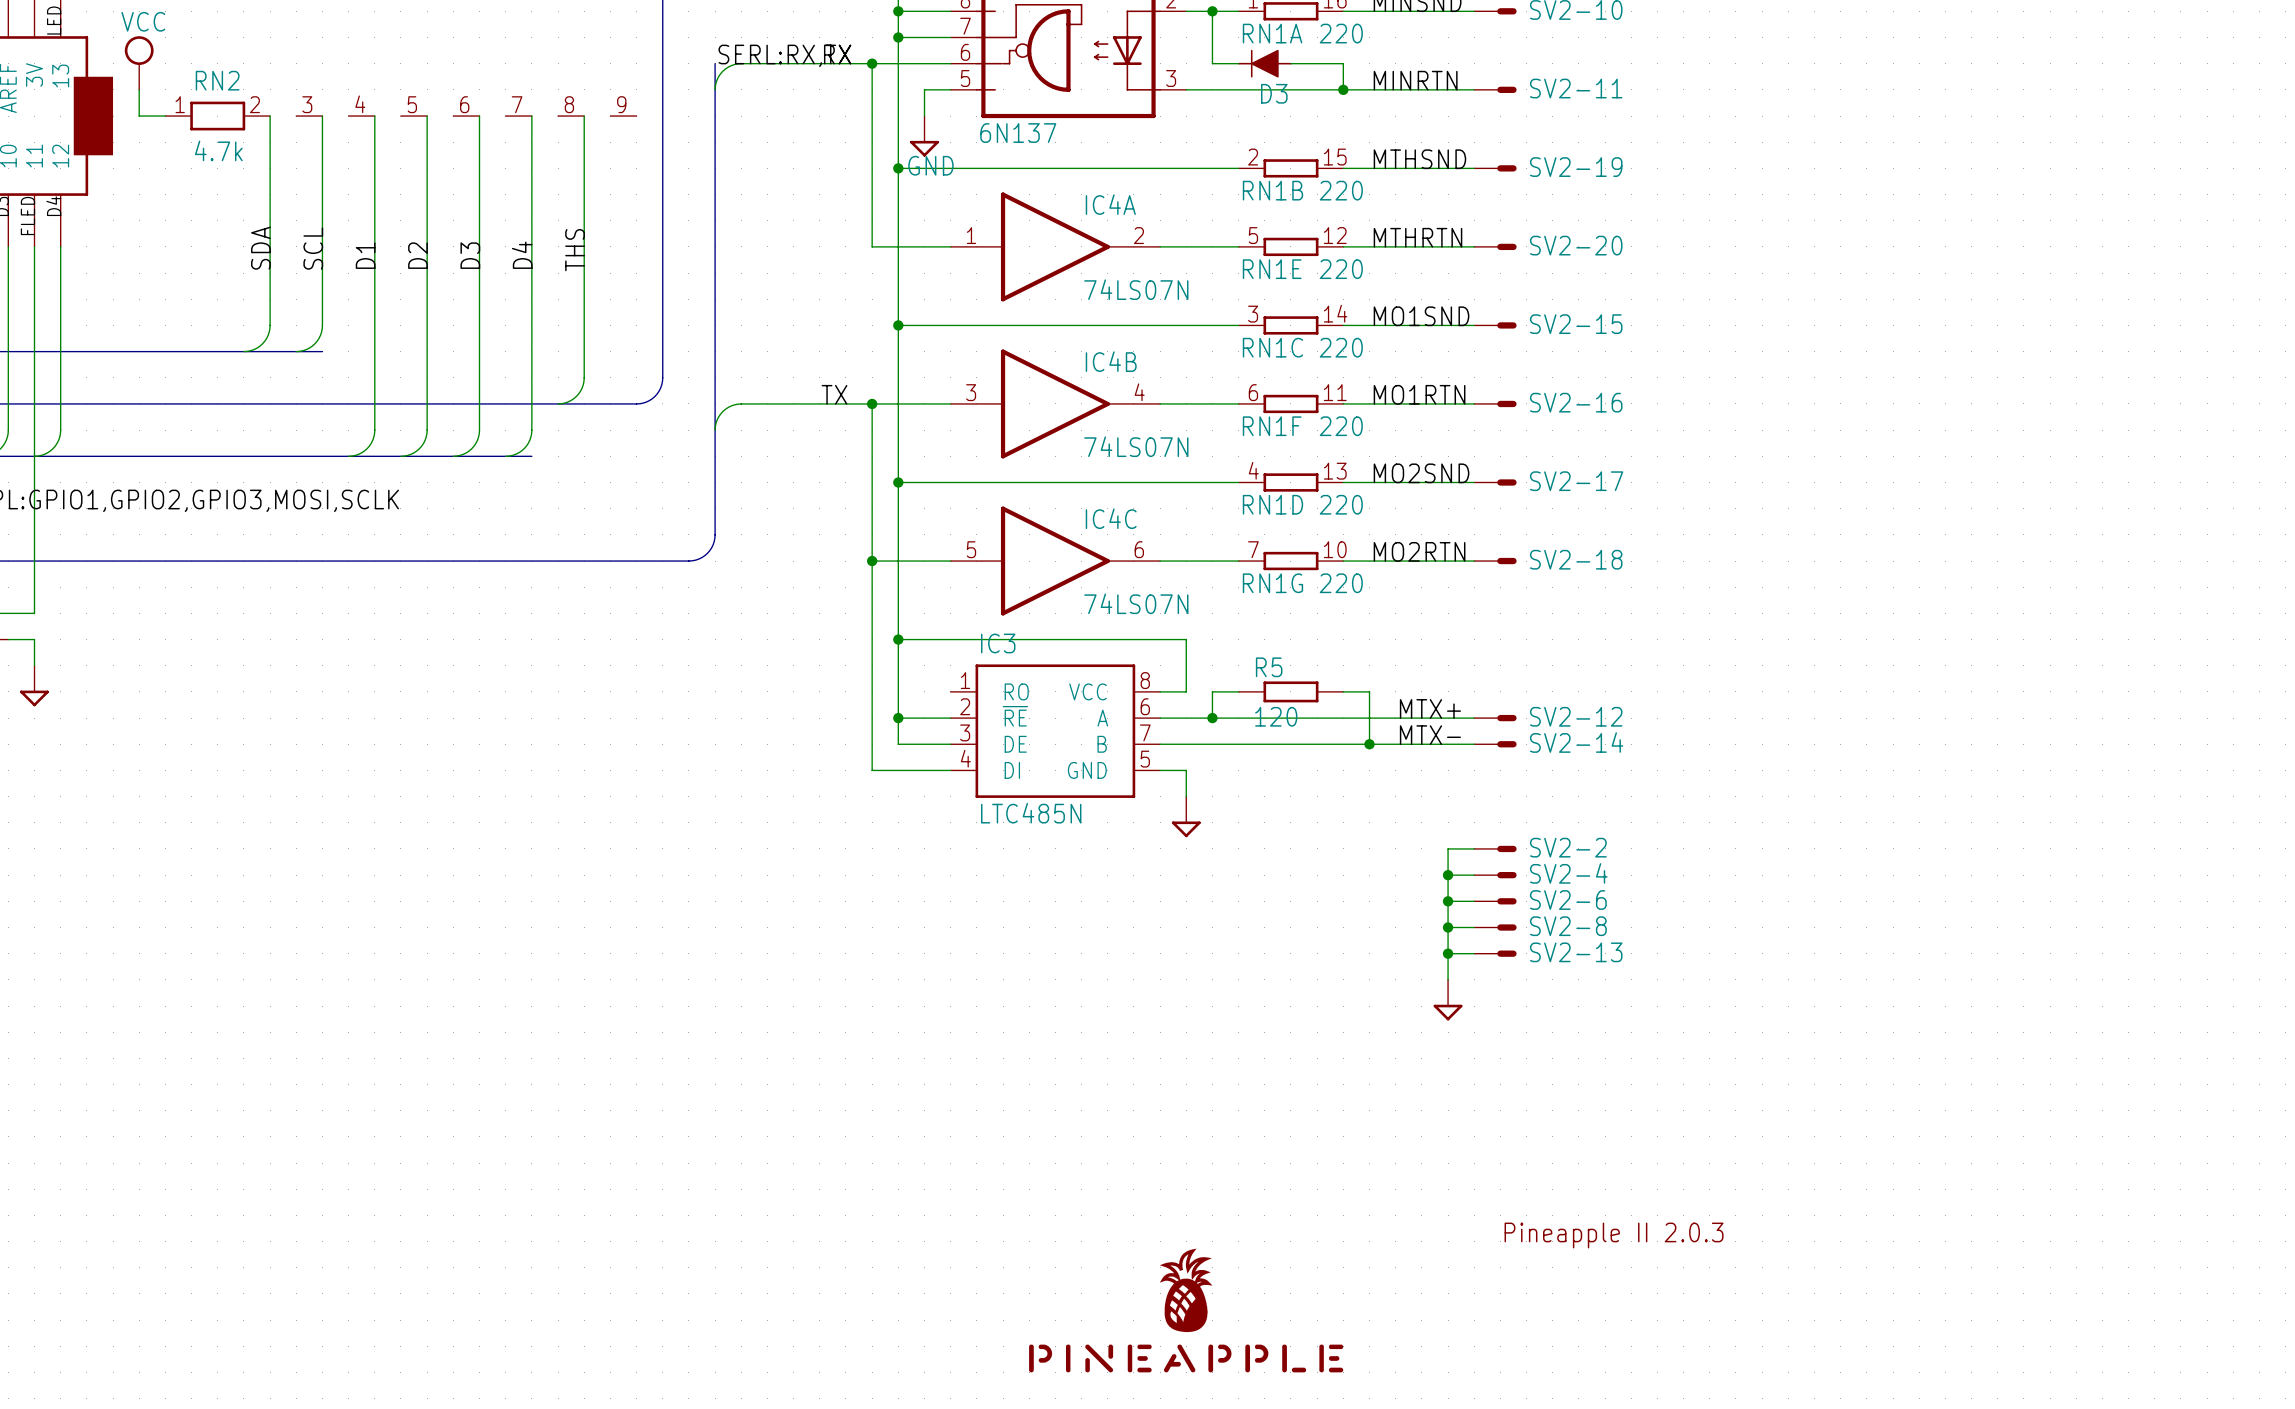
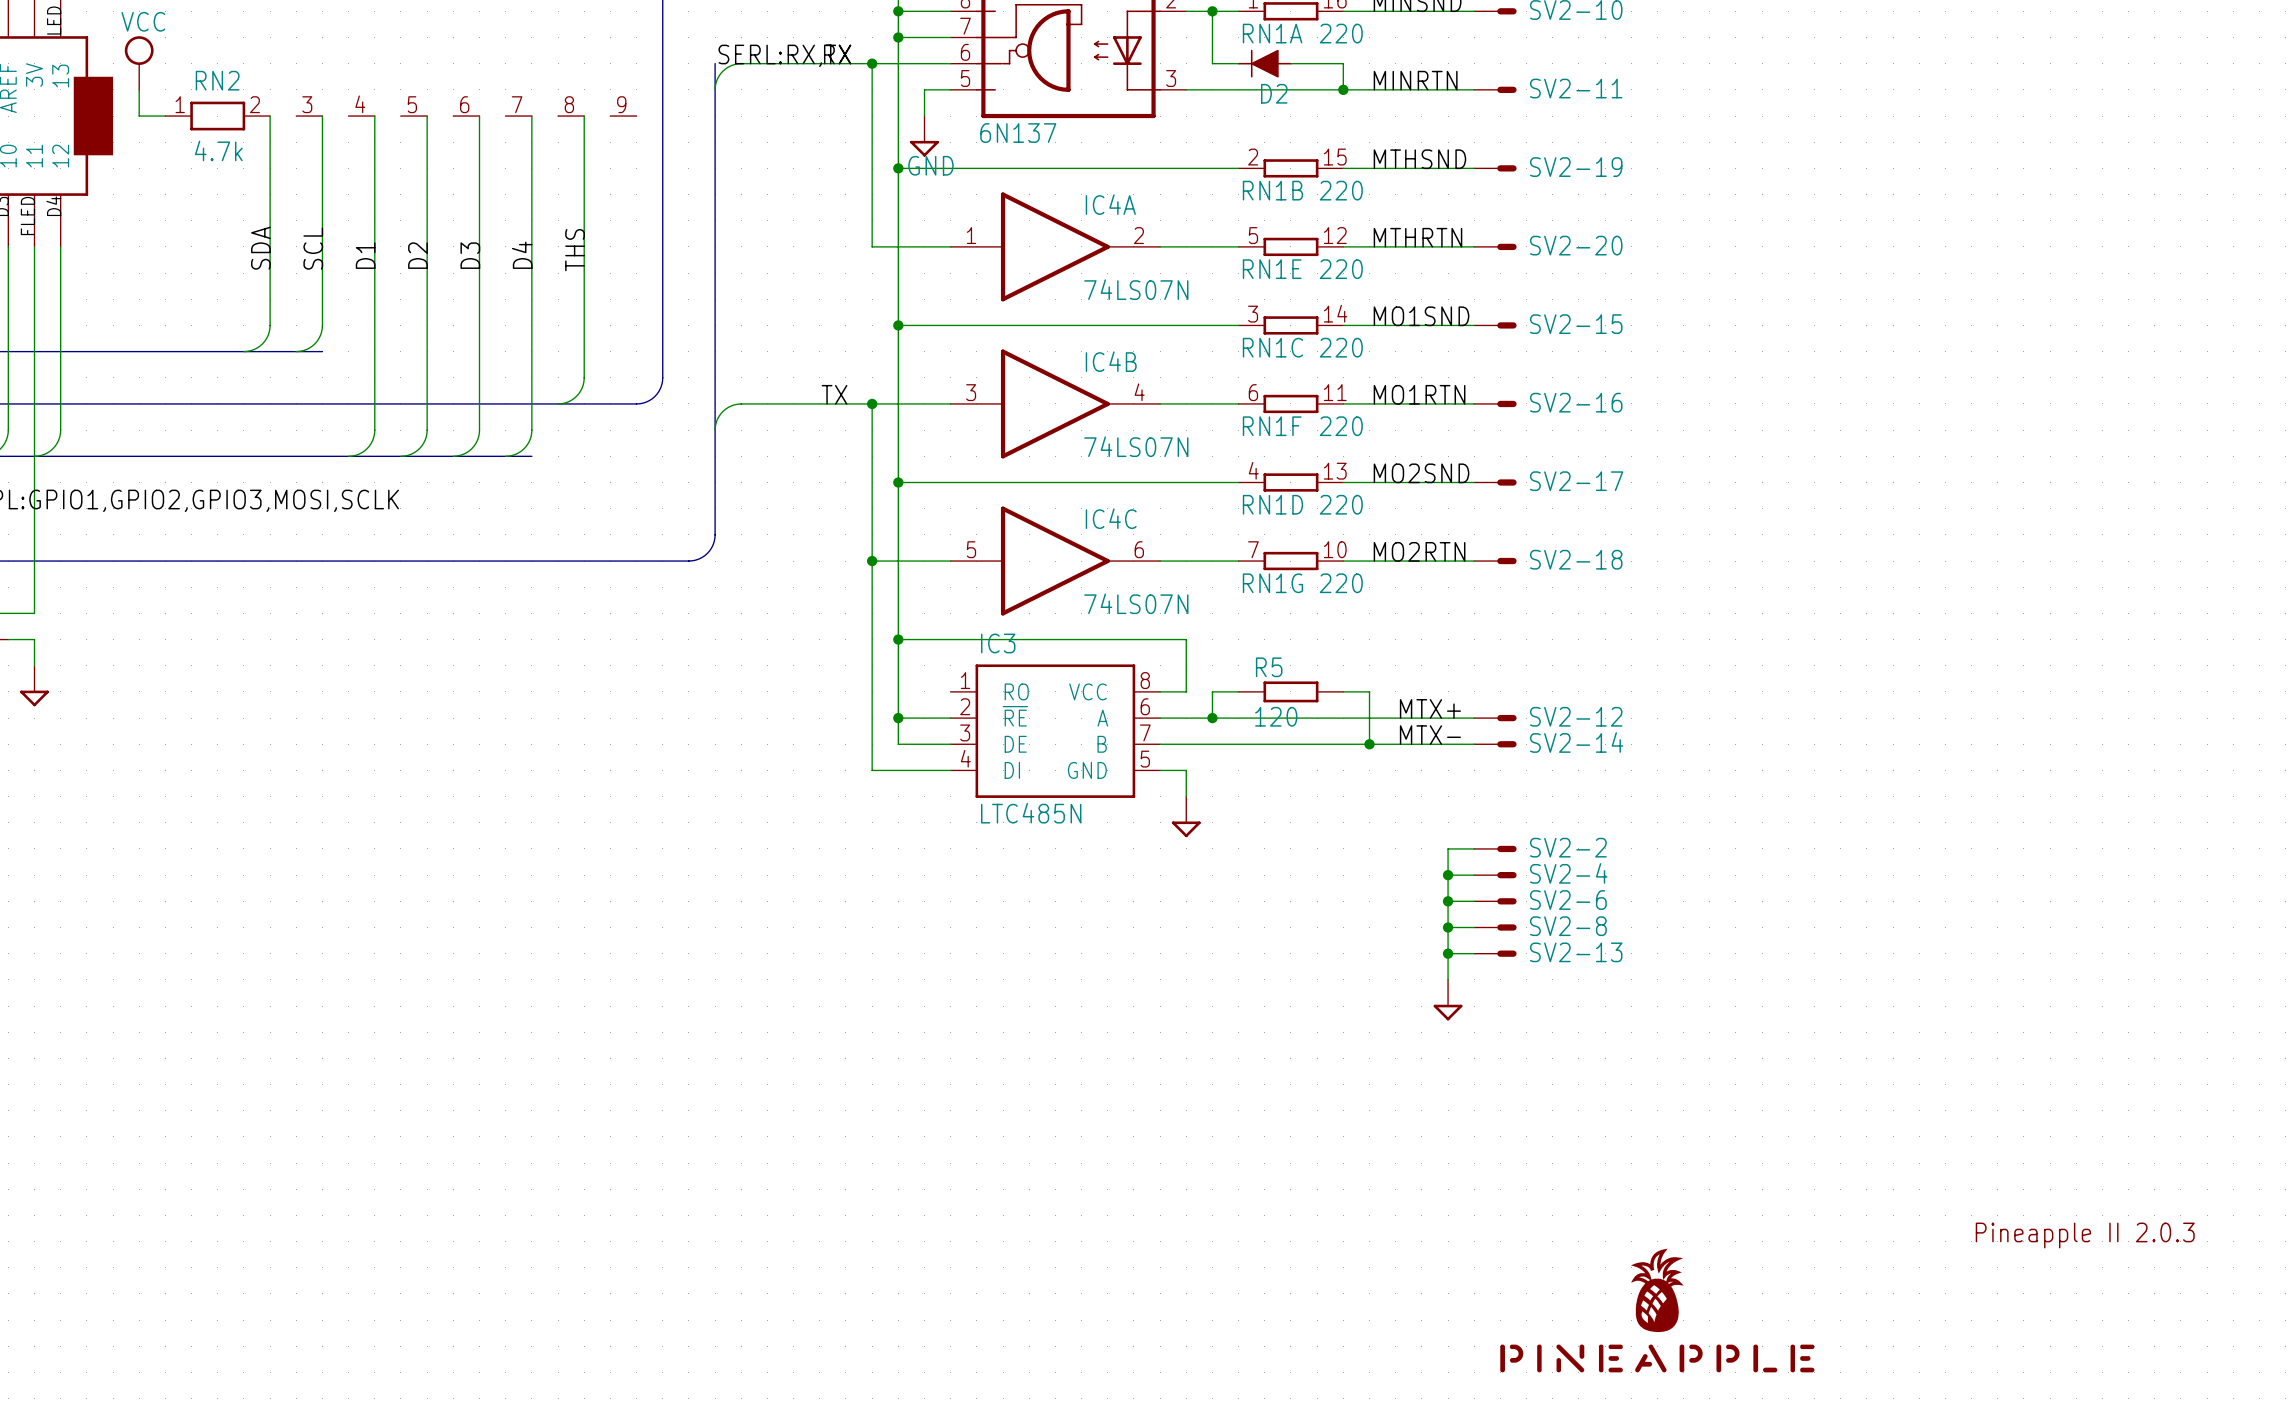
D3 name: D3 (1274, 93) -> D2 (1274, 93)
text: Pineapple II 2.0.3 (1614, 1235) -> none
text: none -> Pineapple II 2.0.3 (2085, 1235)
part: (1186, 1310) -> none
part: none -> (1657, 1310)

